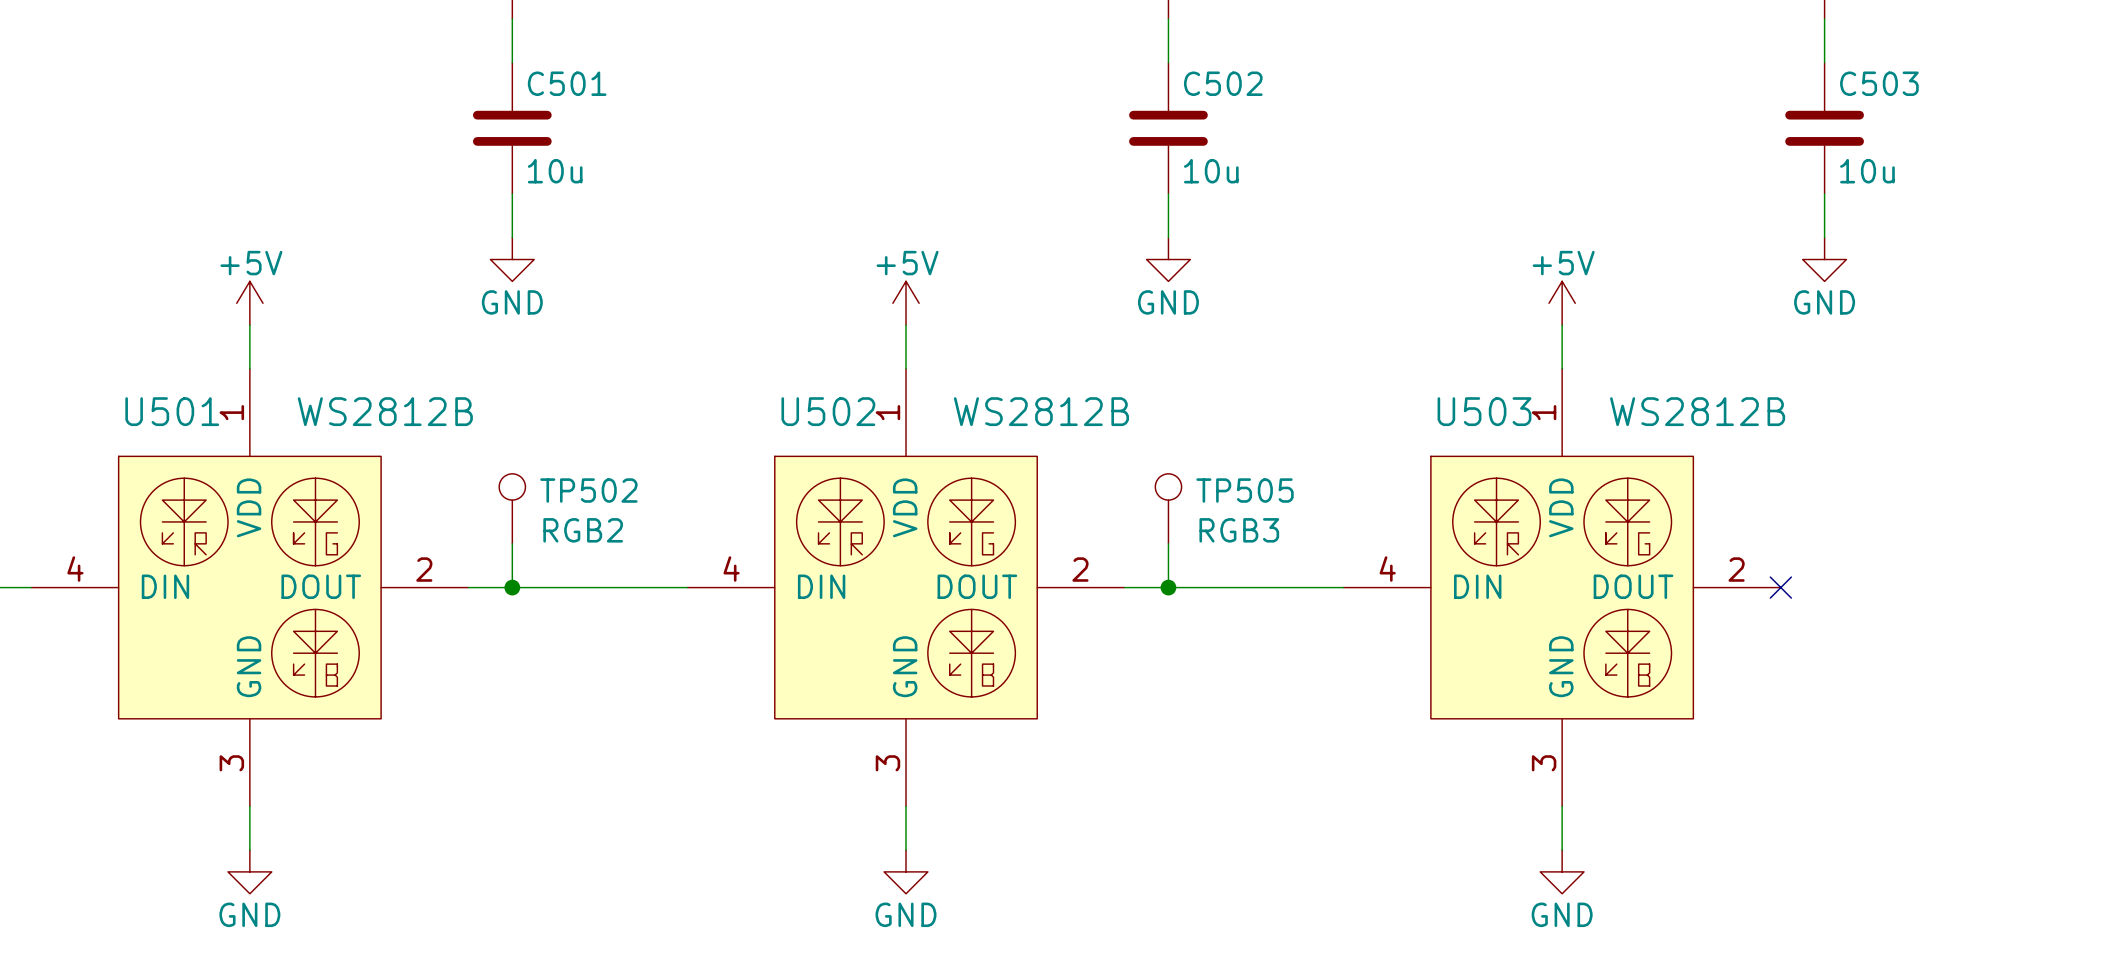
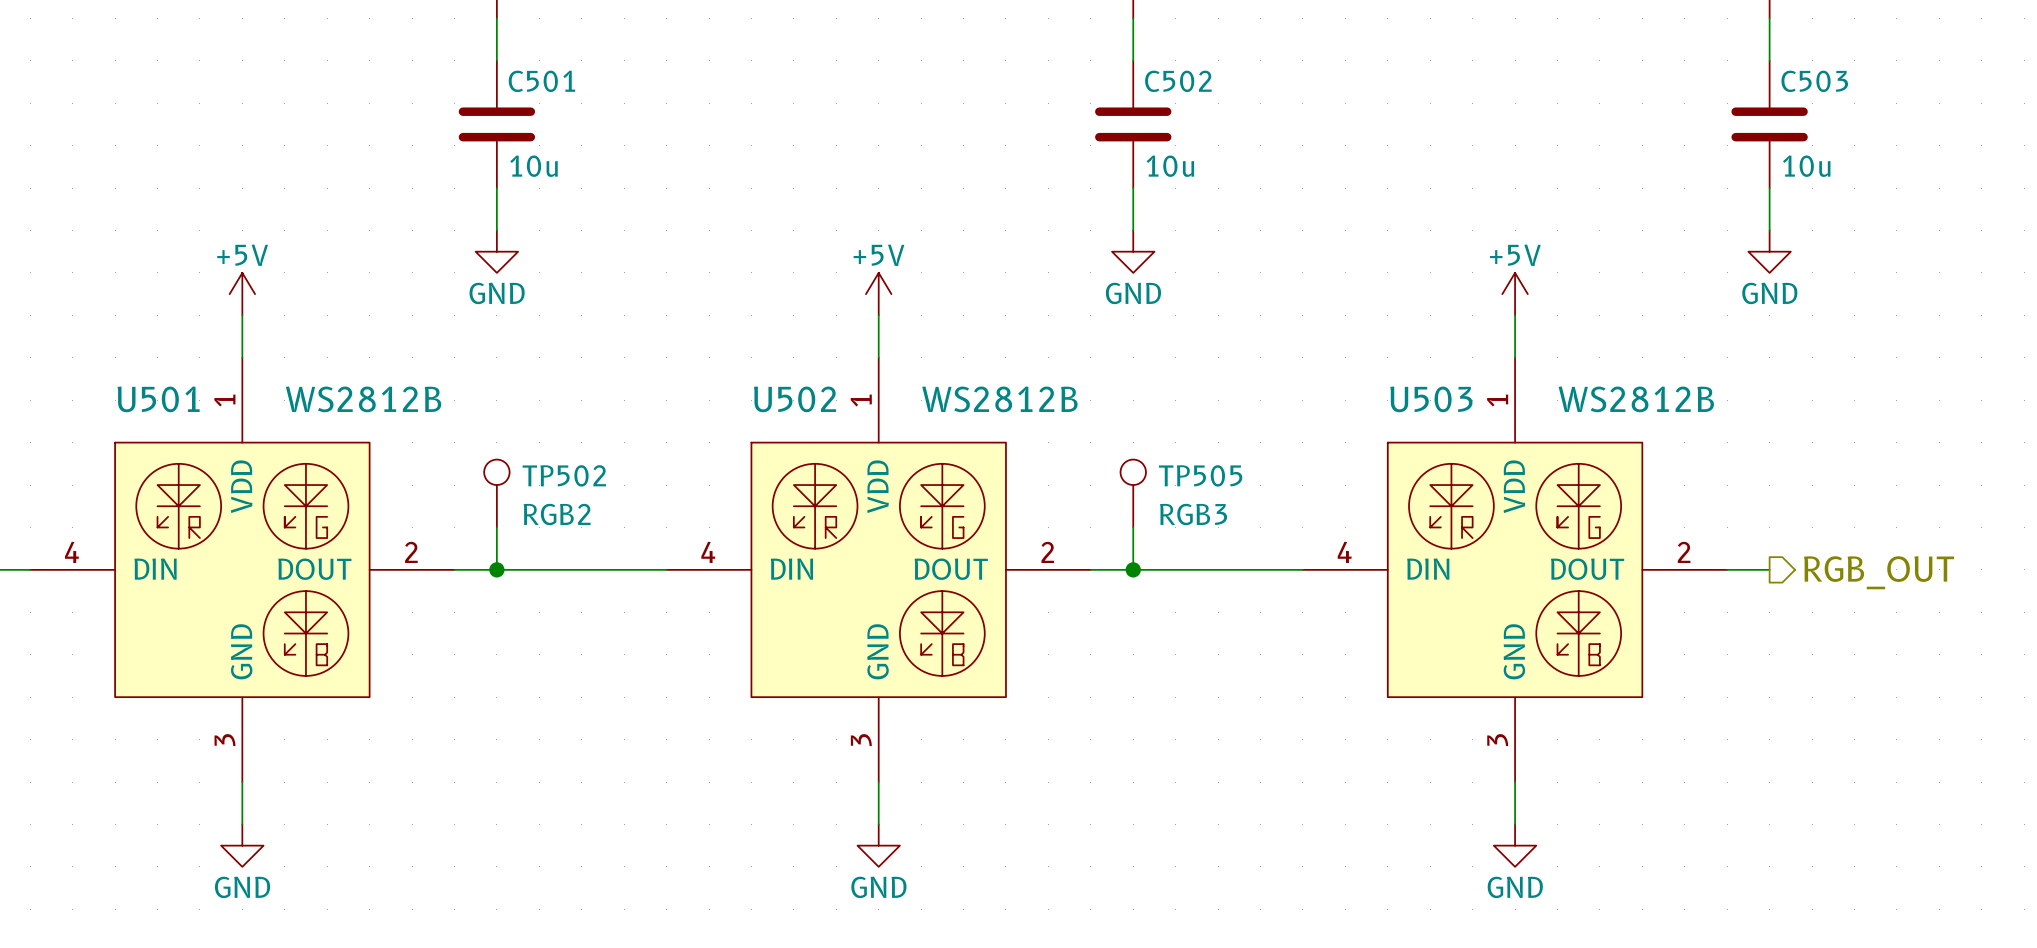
wire: none -> (1727, 569) (1769, 569)
no-connect mark: (1780, 587) -> none
hierarchical label: none -> RGB_OUT (1879, 572)

